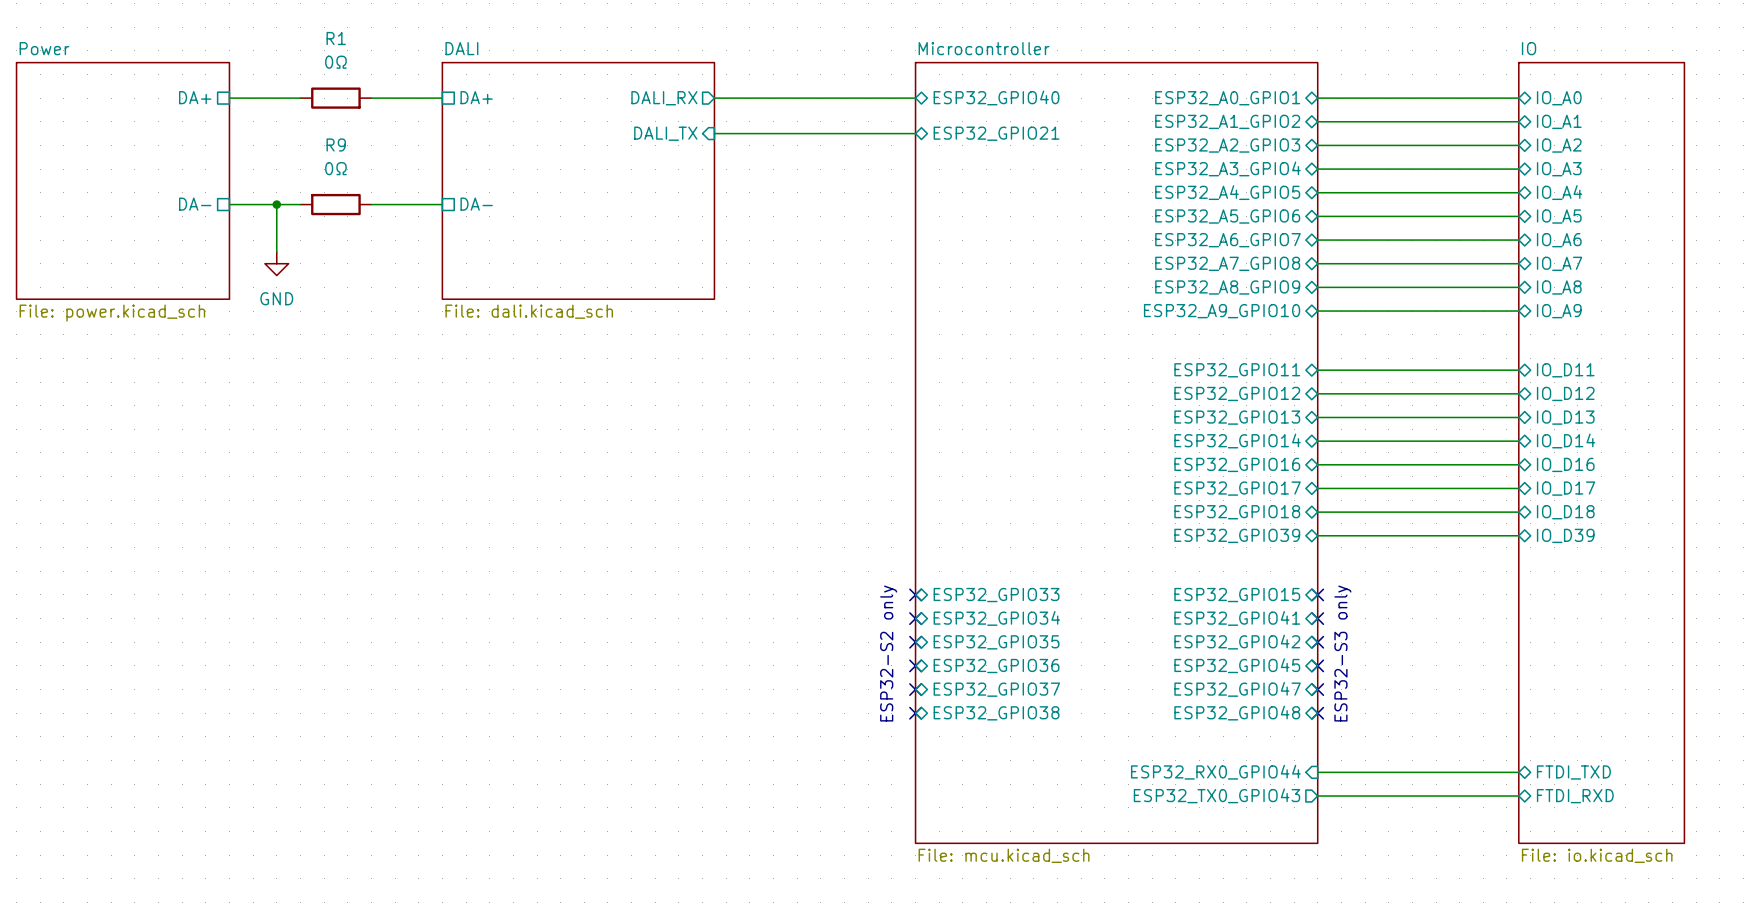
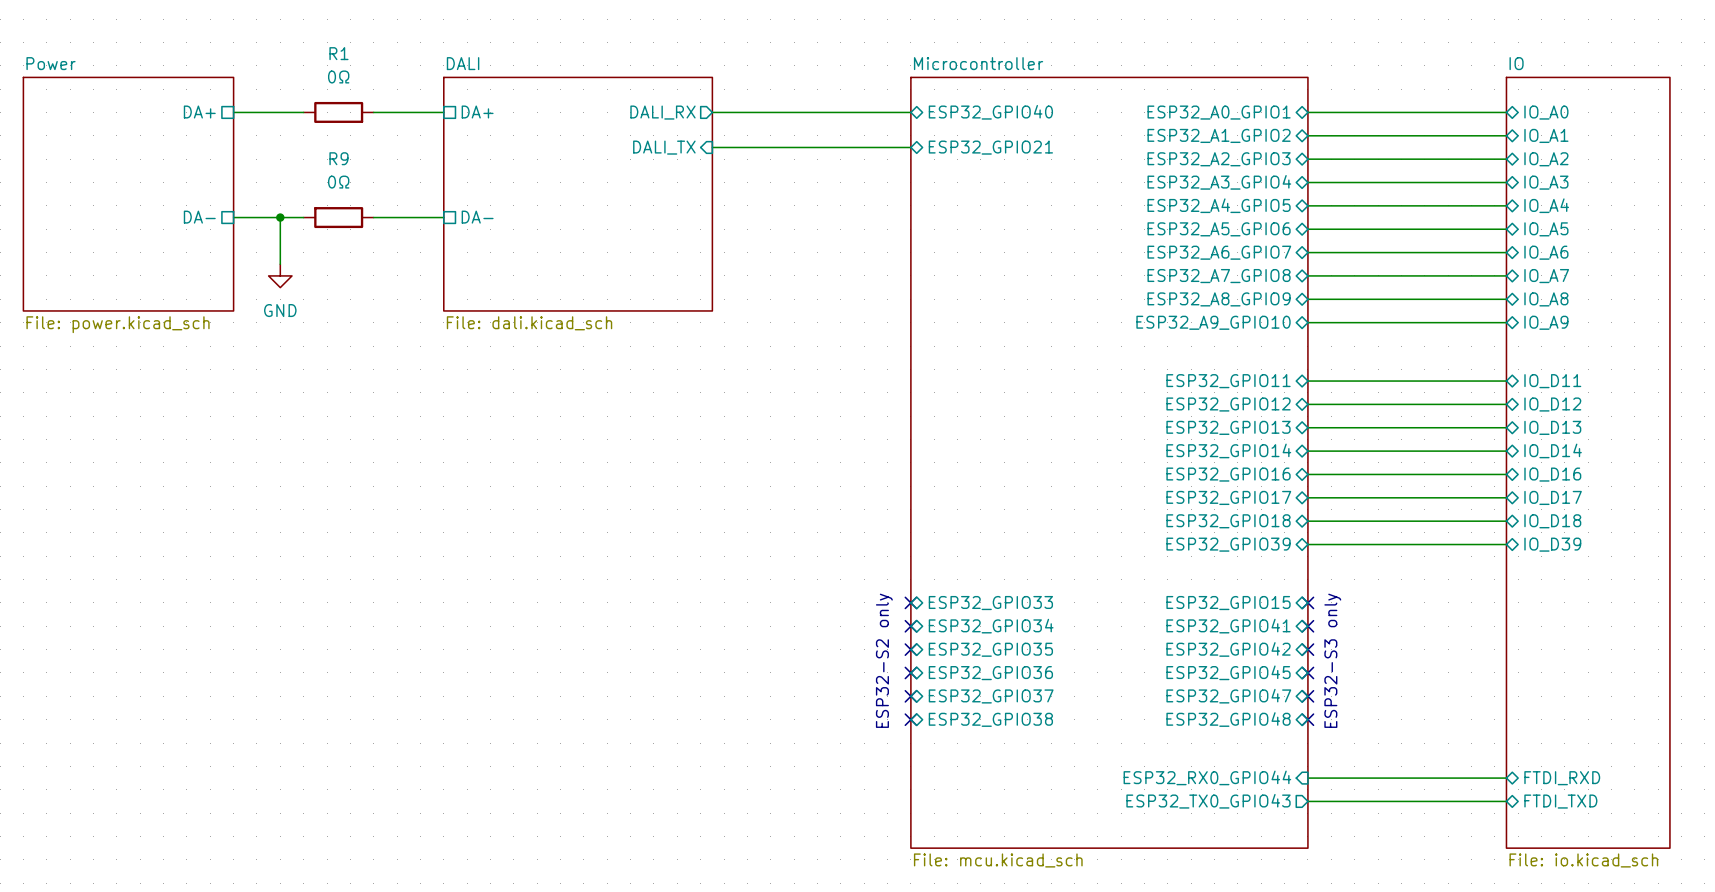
sheet pin: FTDI_TXD (1573, 772) -> FTDI_RXD (1562, 778)
sheet pin: FTDI_RXD (1575, 796) -> FTDI_TXD (1560, 801)

